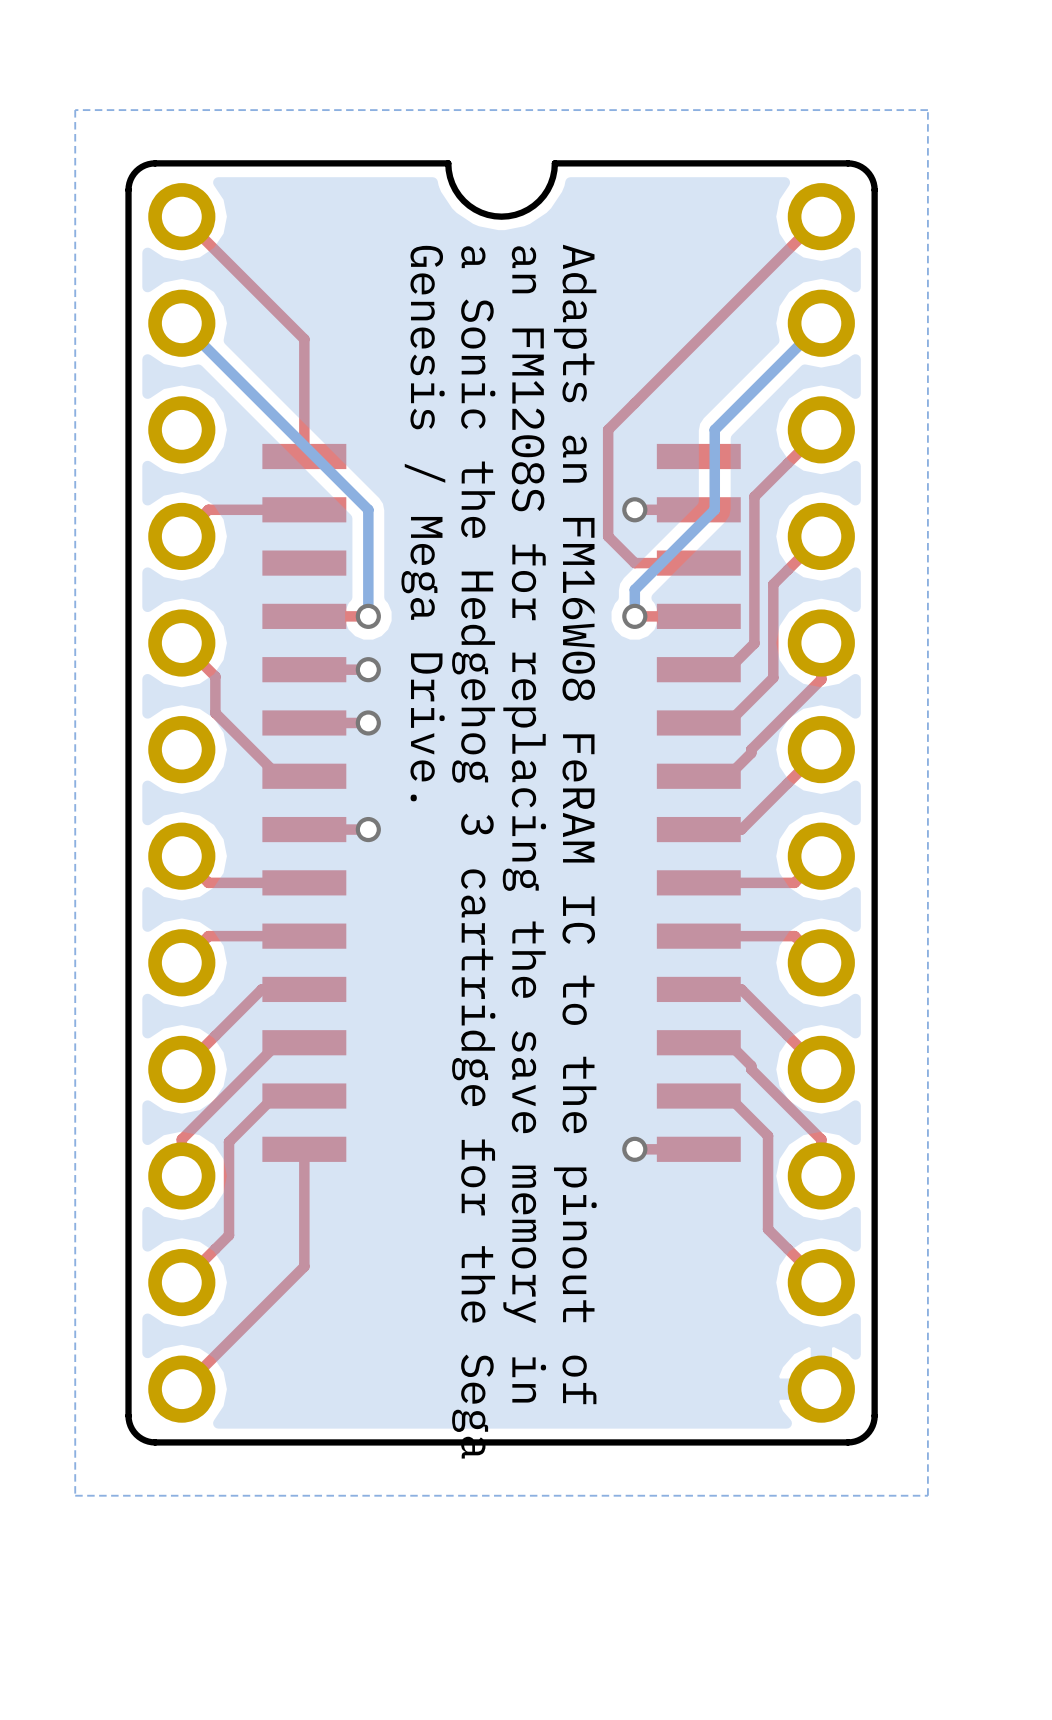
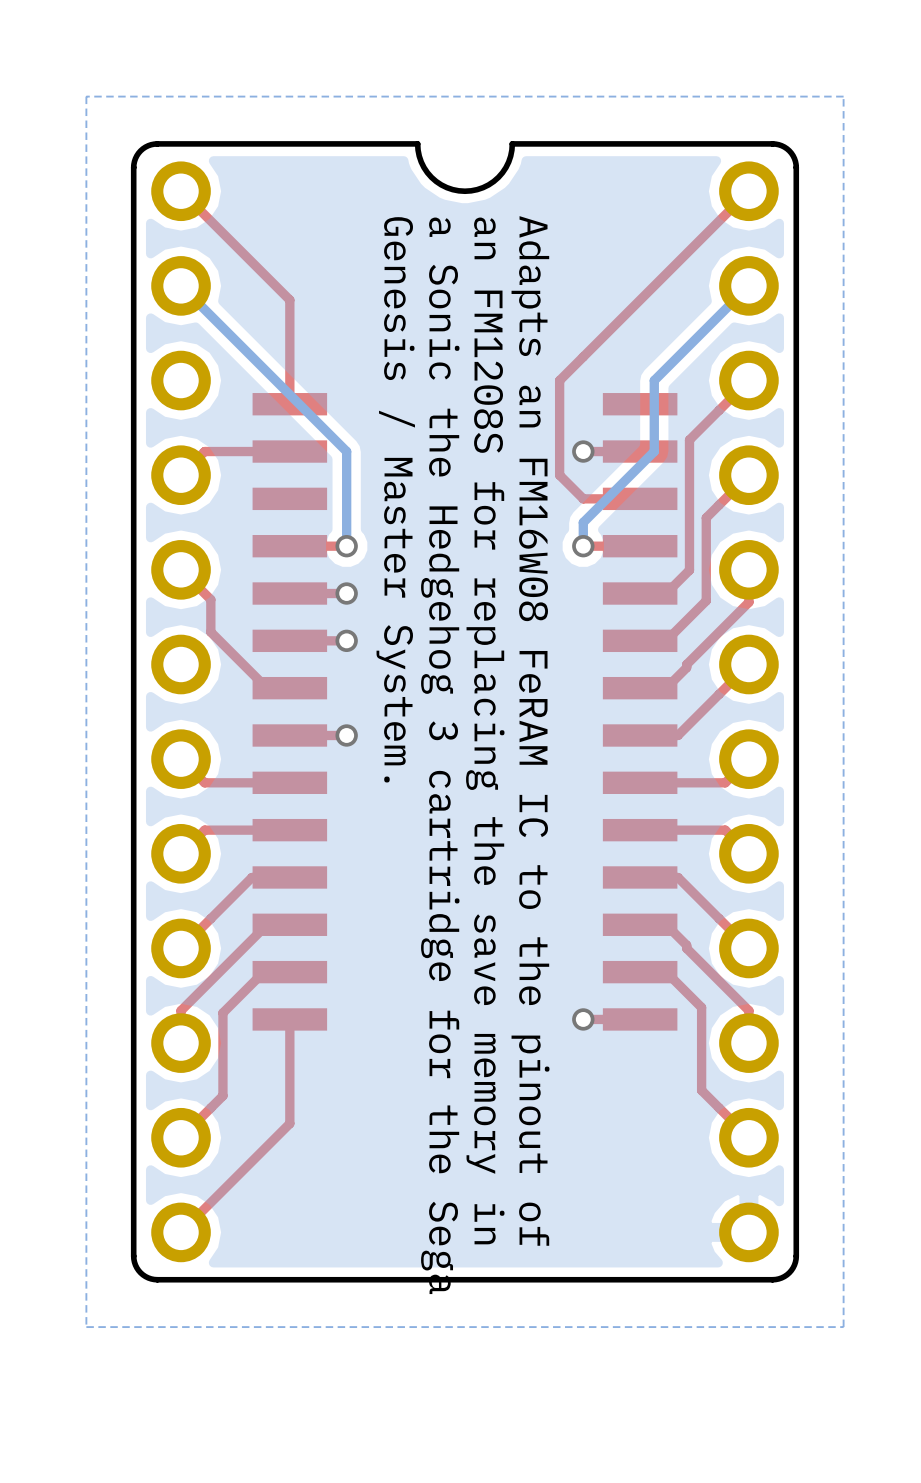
text: Genesis / Mega Drive. (423, 523) -> Genesis / Master System. (395, 499)

